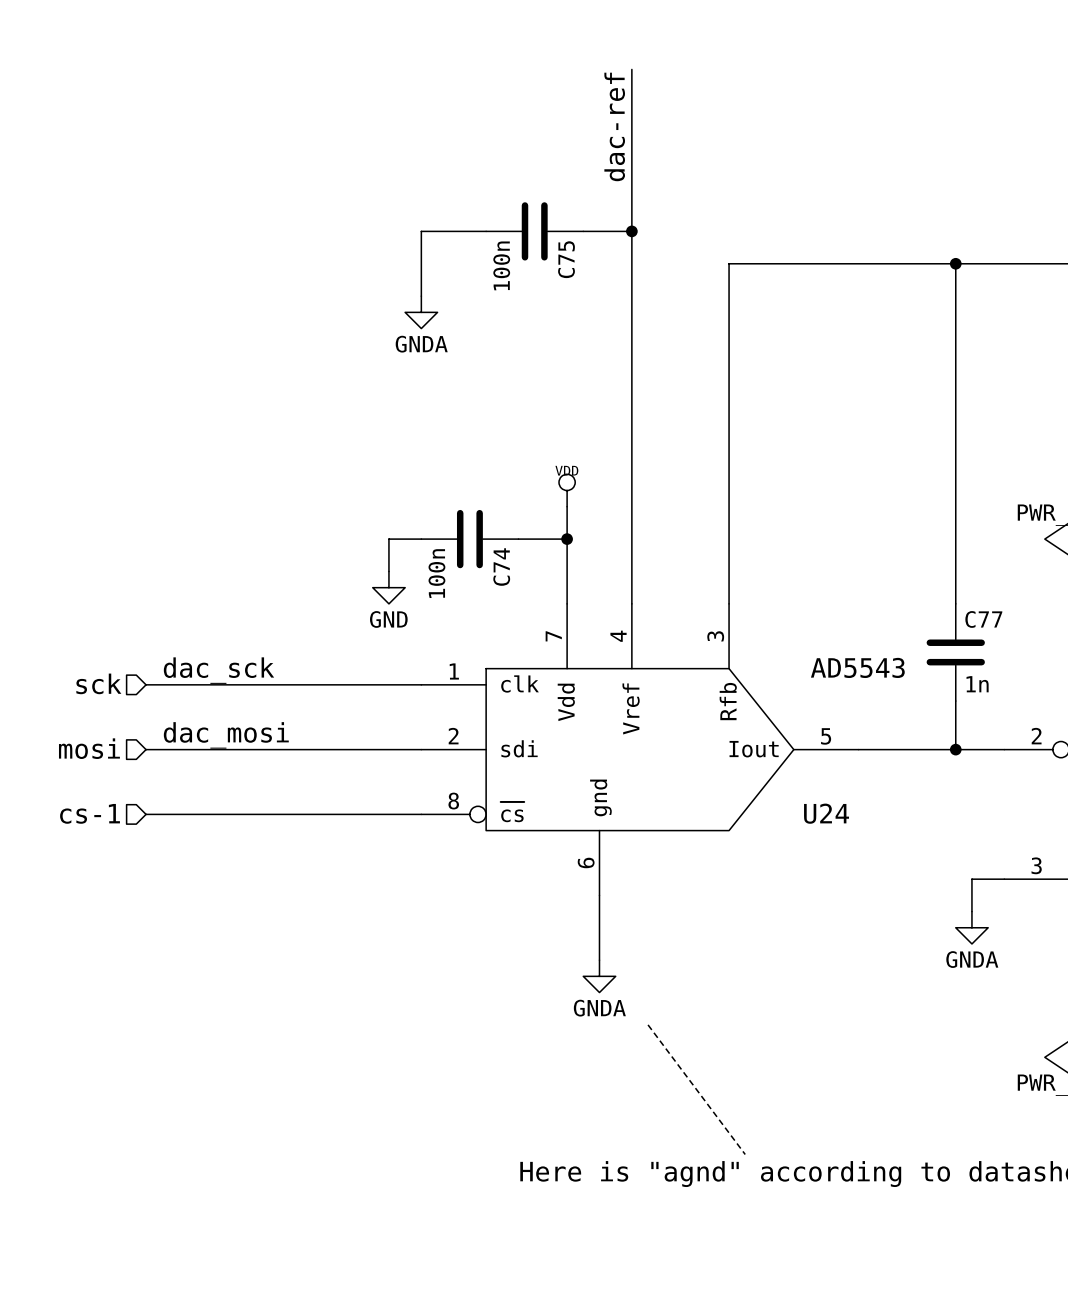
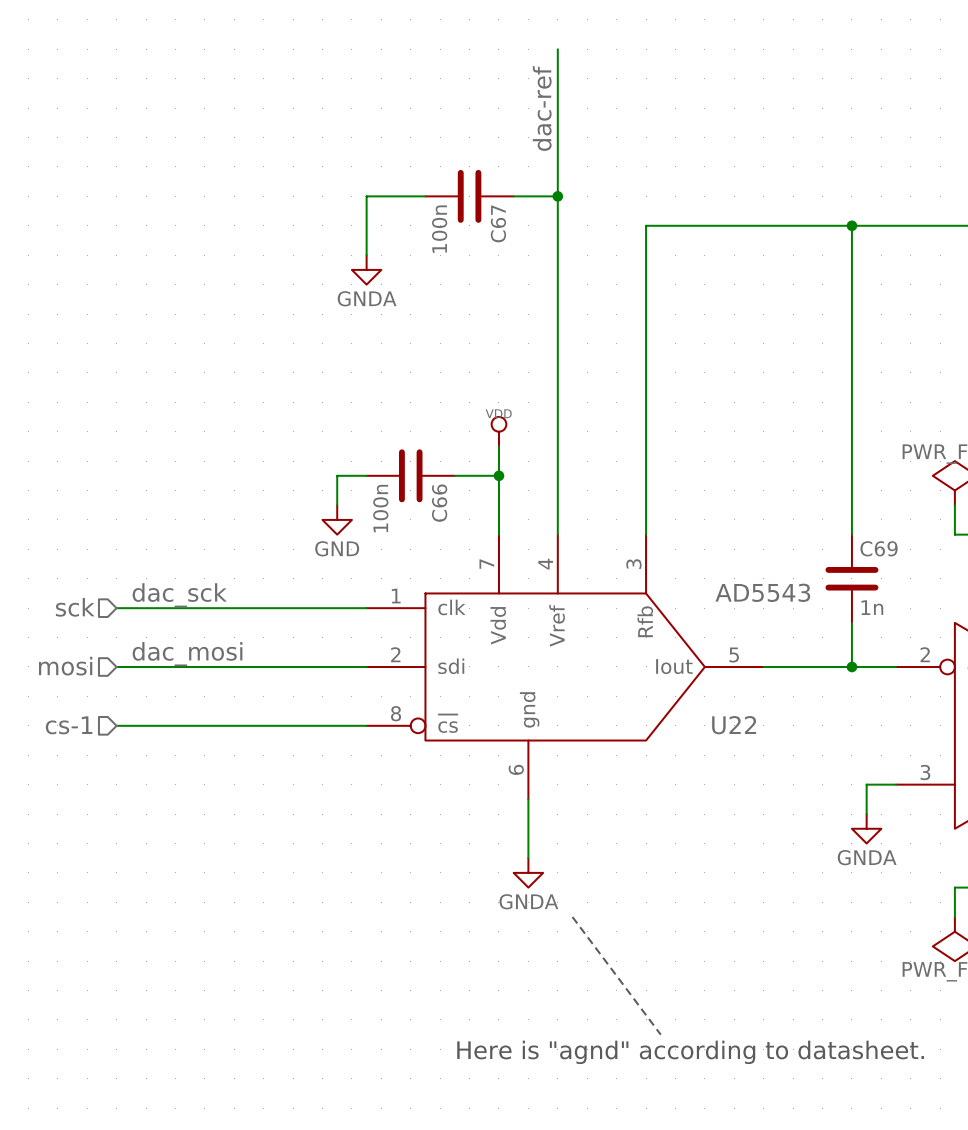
C75 name: C75 (566, 259) -> C67 (498, 223)
C74 name: C74 (501, 567) -> C66 (439, 503)
C77 name: C77 (983, 619) -> C69 (879, 548)
U24 name: U24 (826, 813) -> U22 (734, 725)

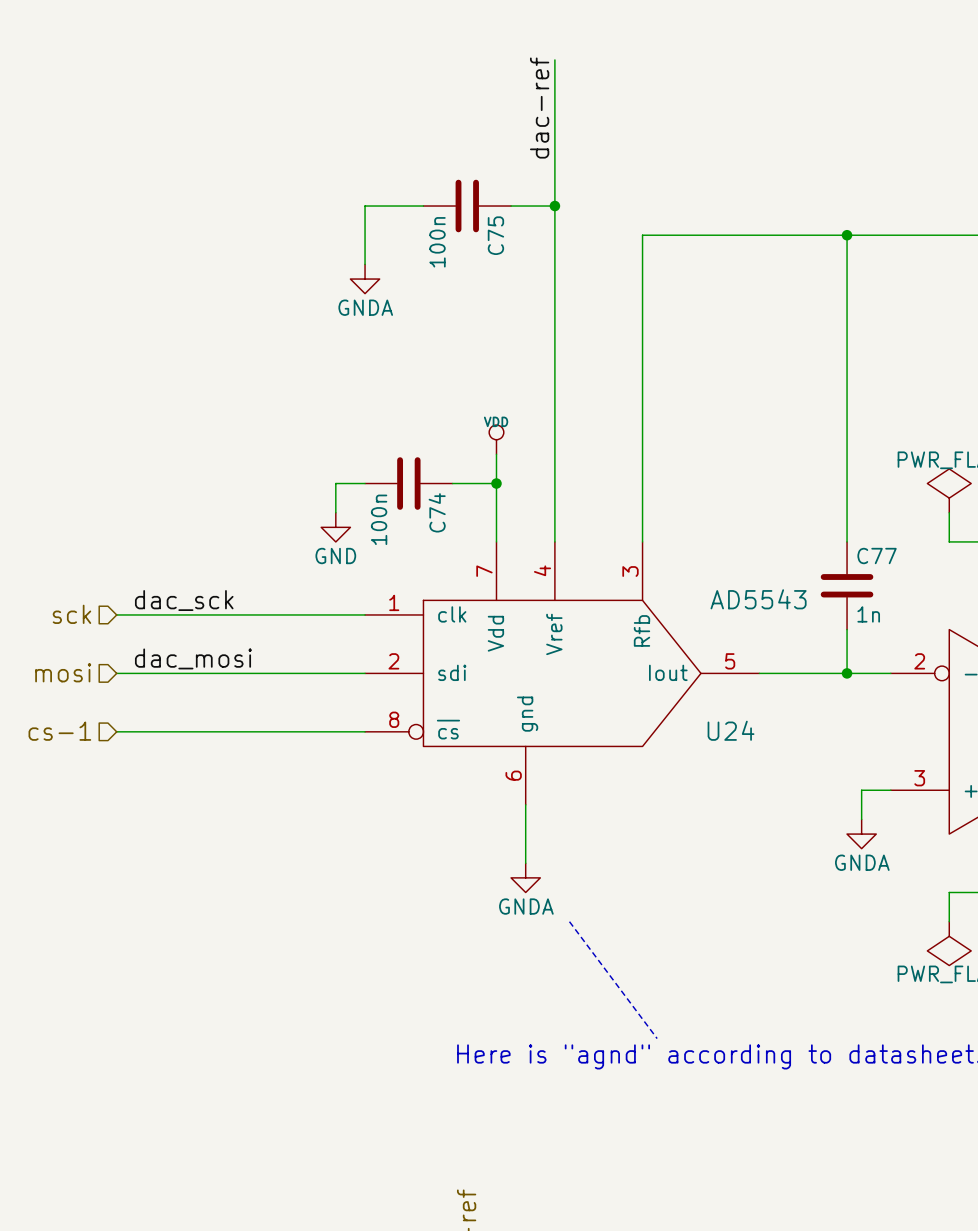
C67 name: C67 (498, 223) -> C75 (495, 235)
C66 name: C66 (439, 503) -> C74 (437, 512)
C69 name: C69 (879, 548) -> C77 (877, 556)
U22 name: U22 (734, 725) -> U24 (731, 730)

